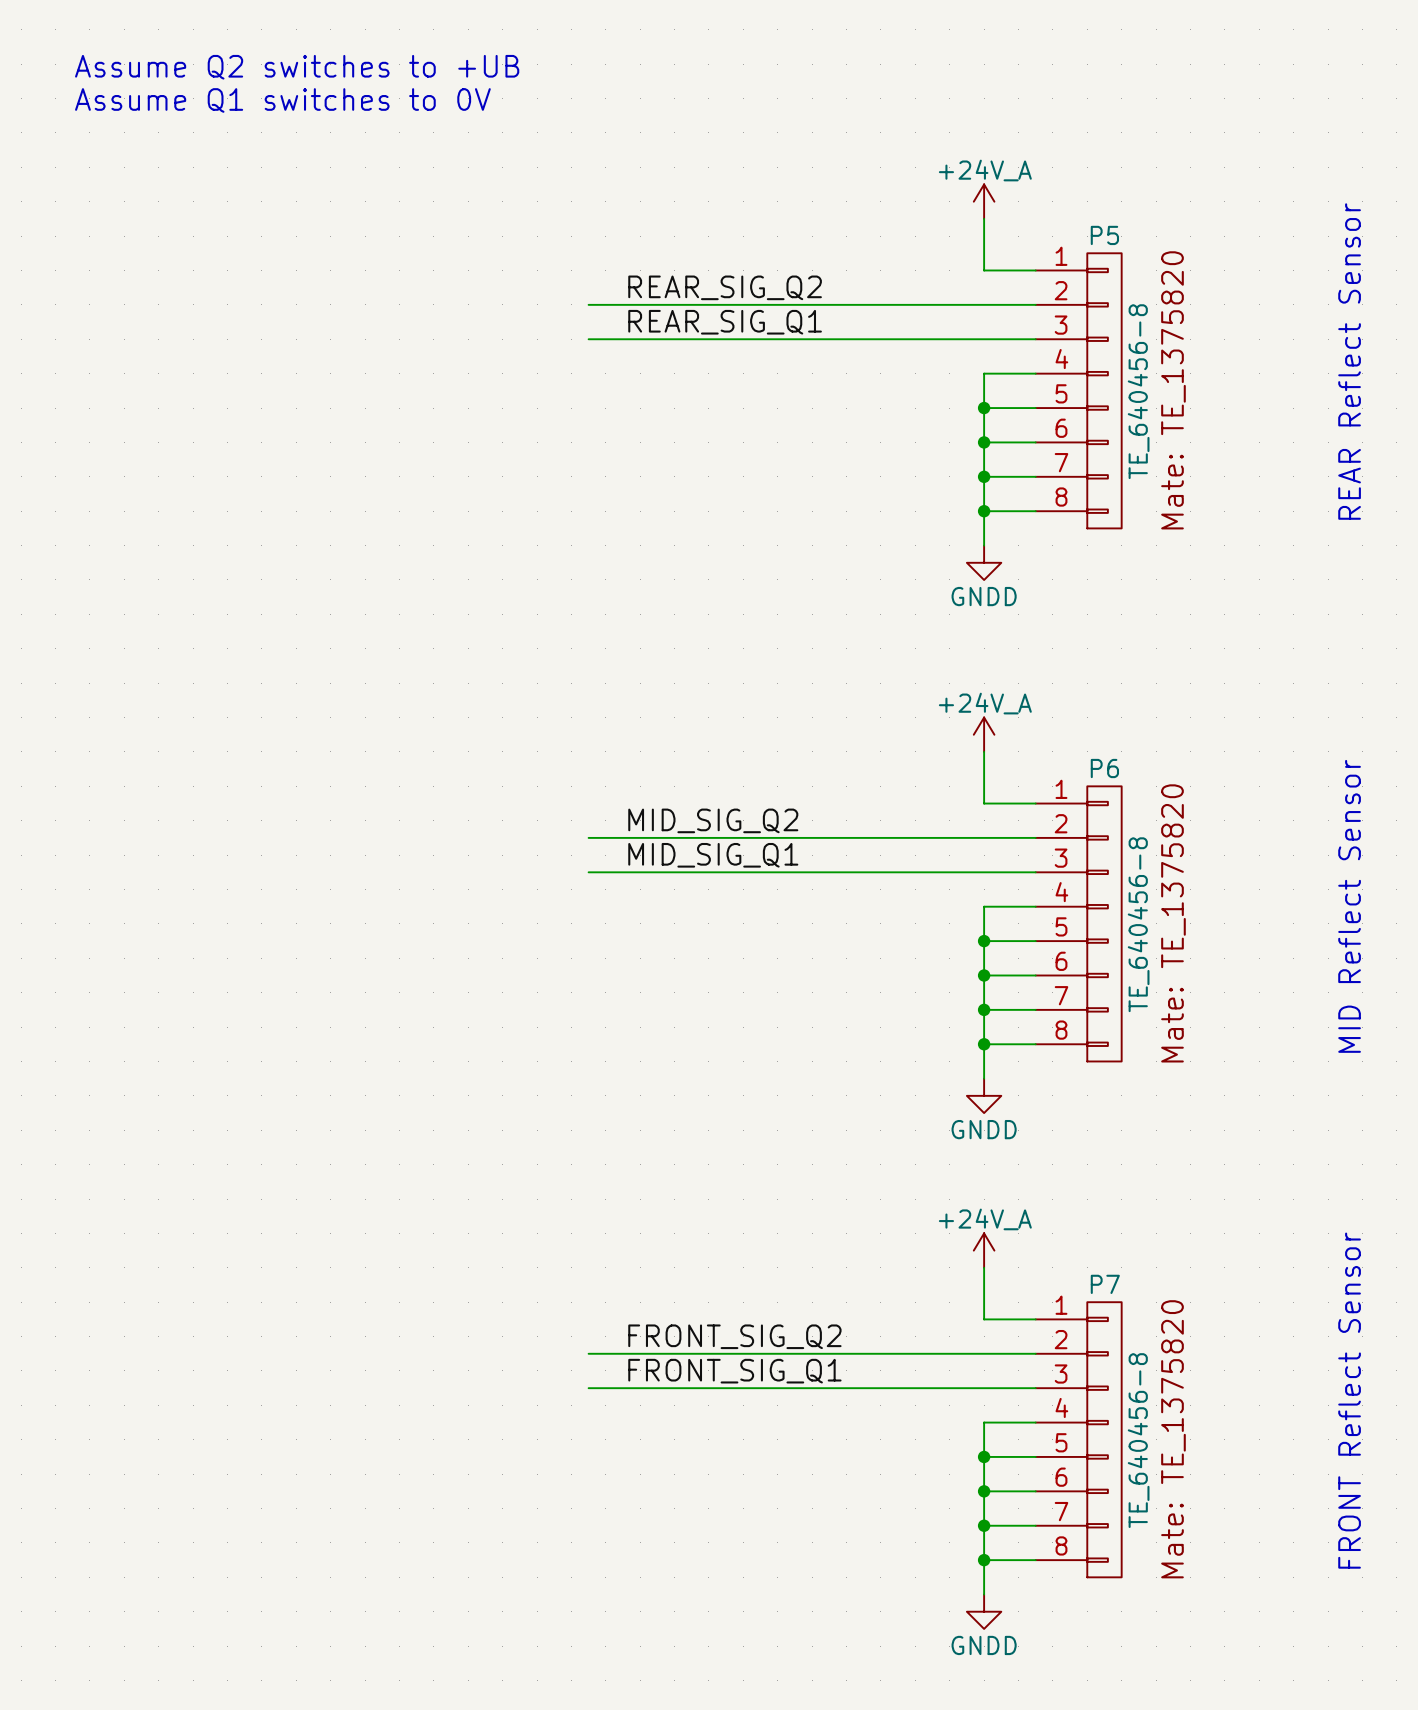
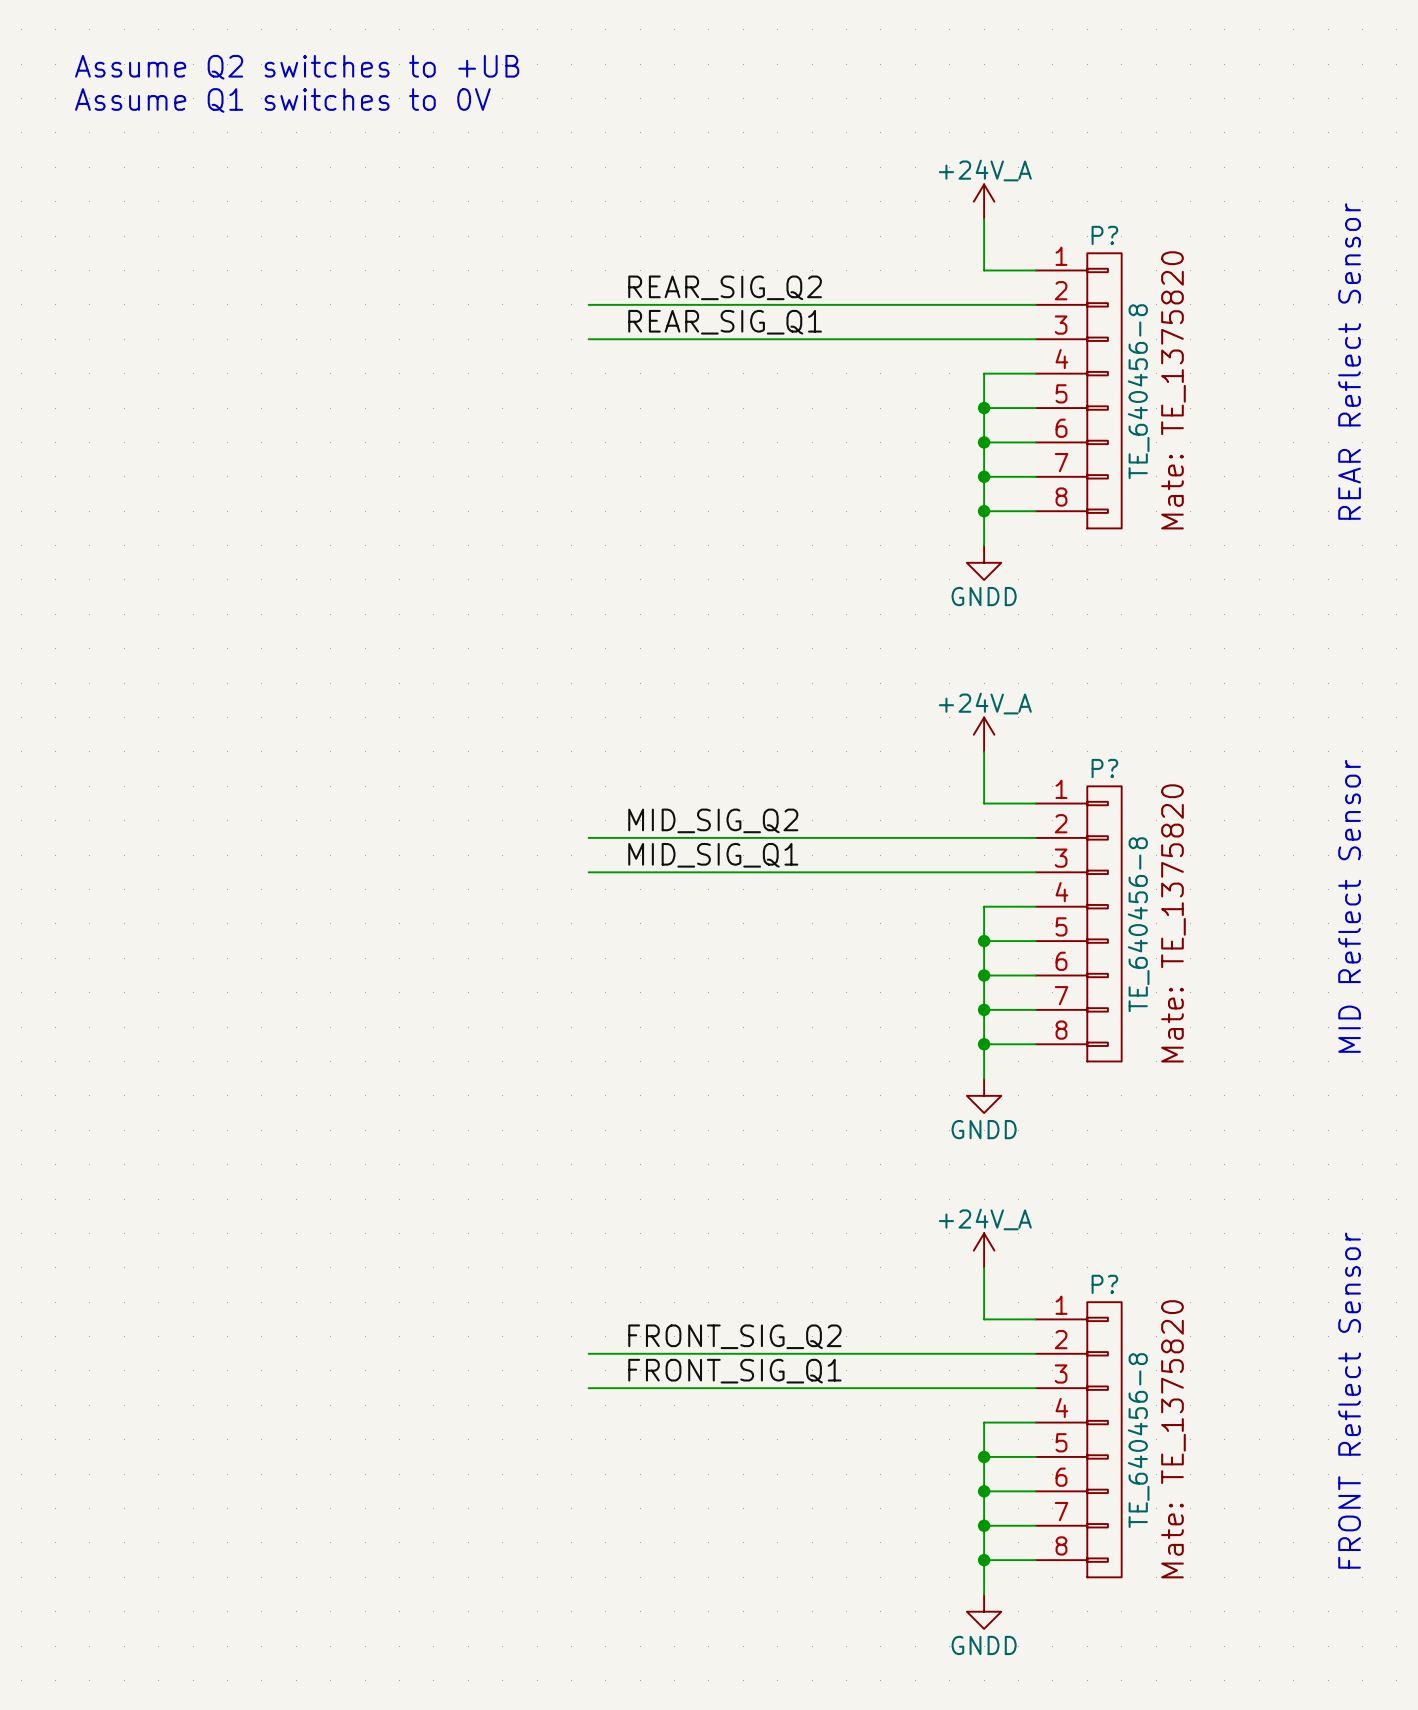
P5 name: P5 (1104, 235) -> P? (1104, 235)
P6 name: P6 (1104, 768) -> P? (1104, 768)
P7 name: P7 (1105, 1284) -> P? (1104, 1284)

